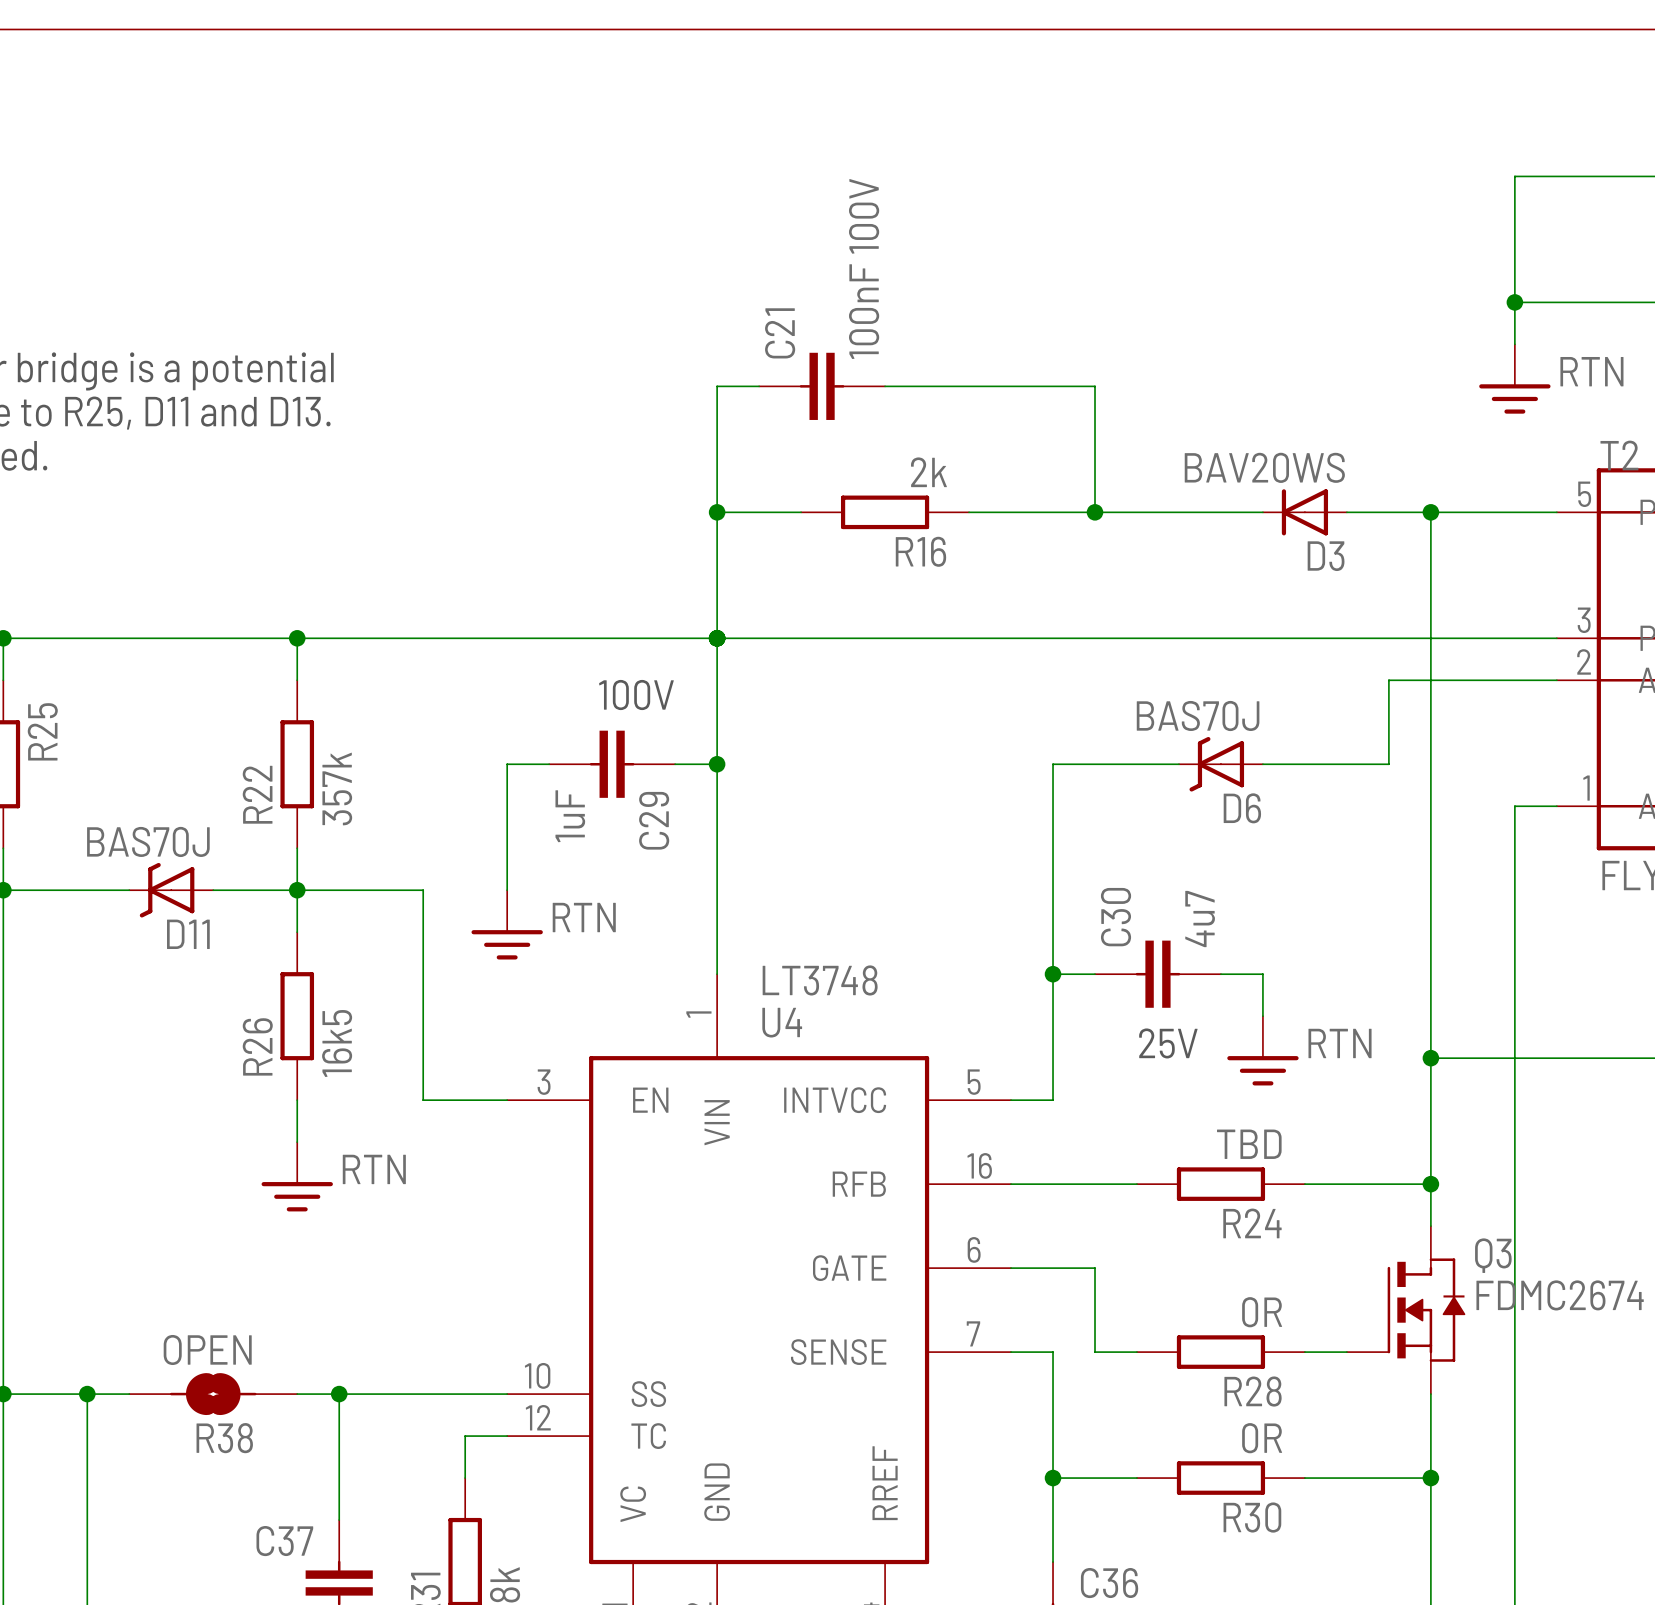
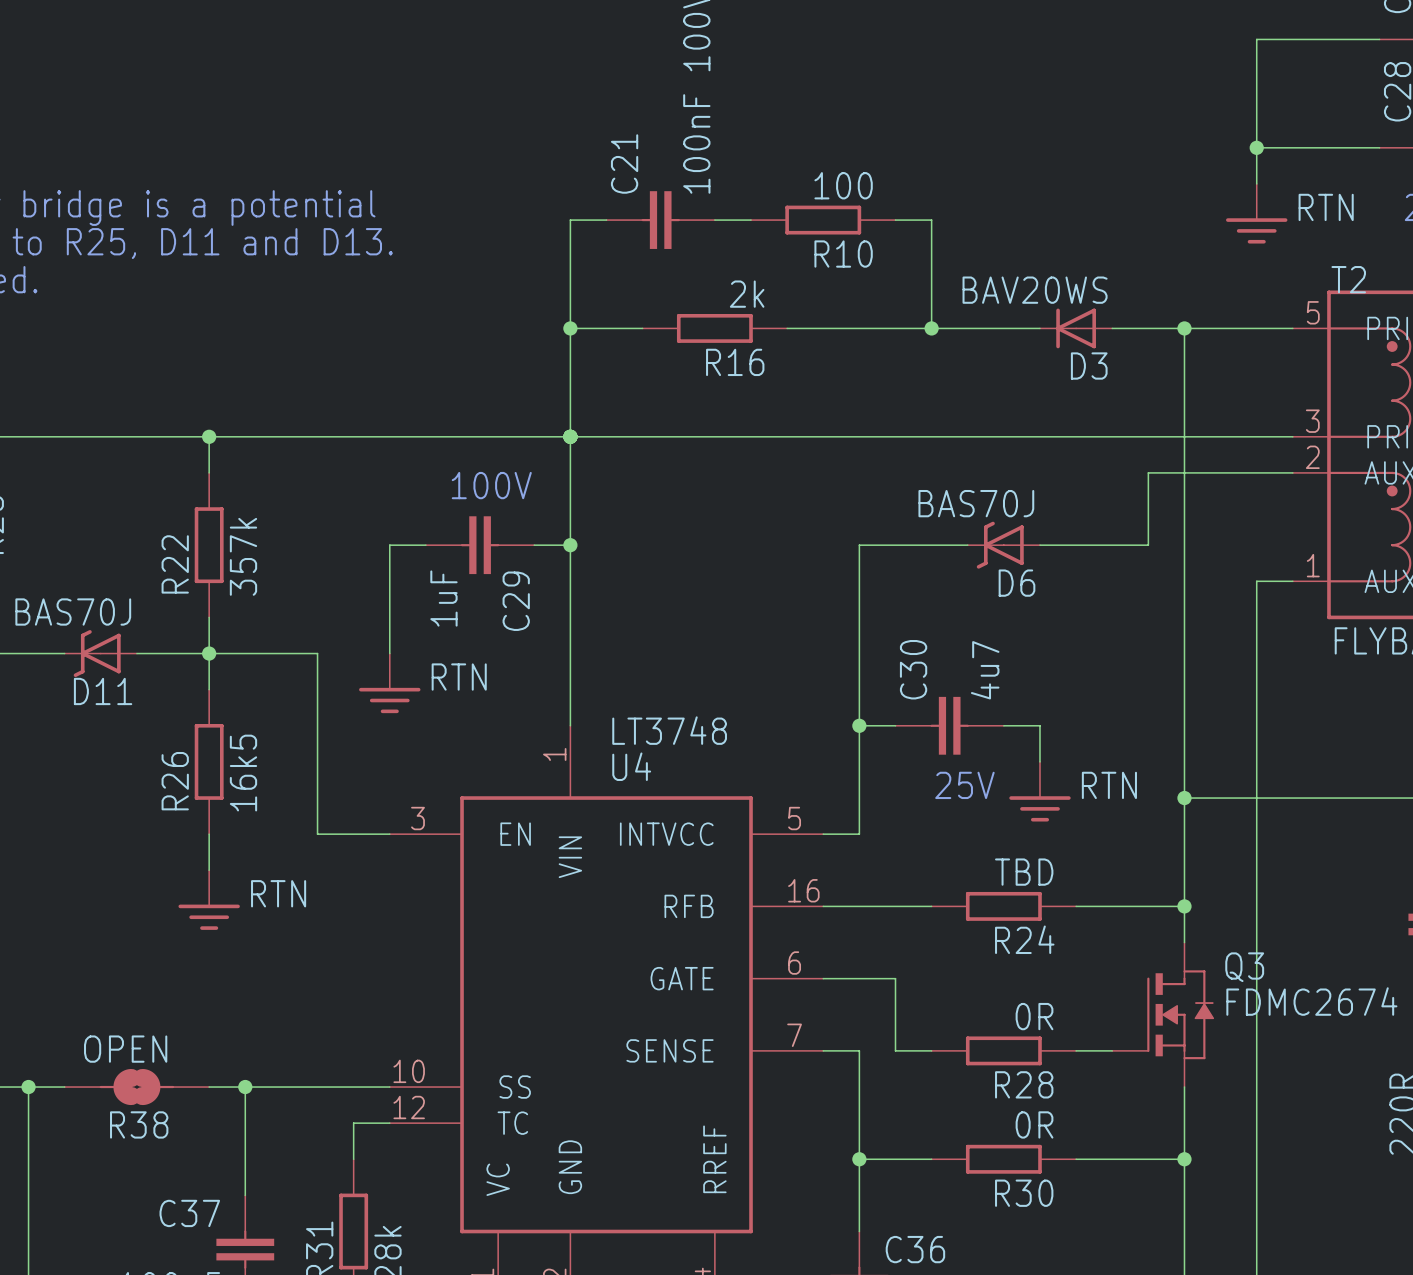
wire: (927, 386) (1095, 386) (1095, 512) -> none
R10: none -> 100 (823, 220)
wire: none -> (895, 220) (931, 220) (931, 328)
junction position: (1095, 512) -> (931, 328)

